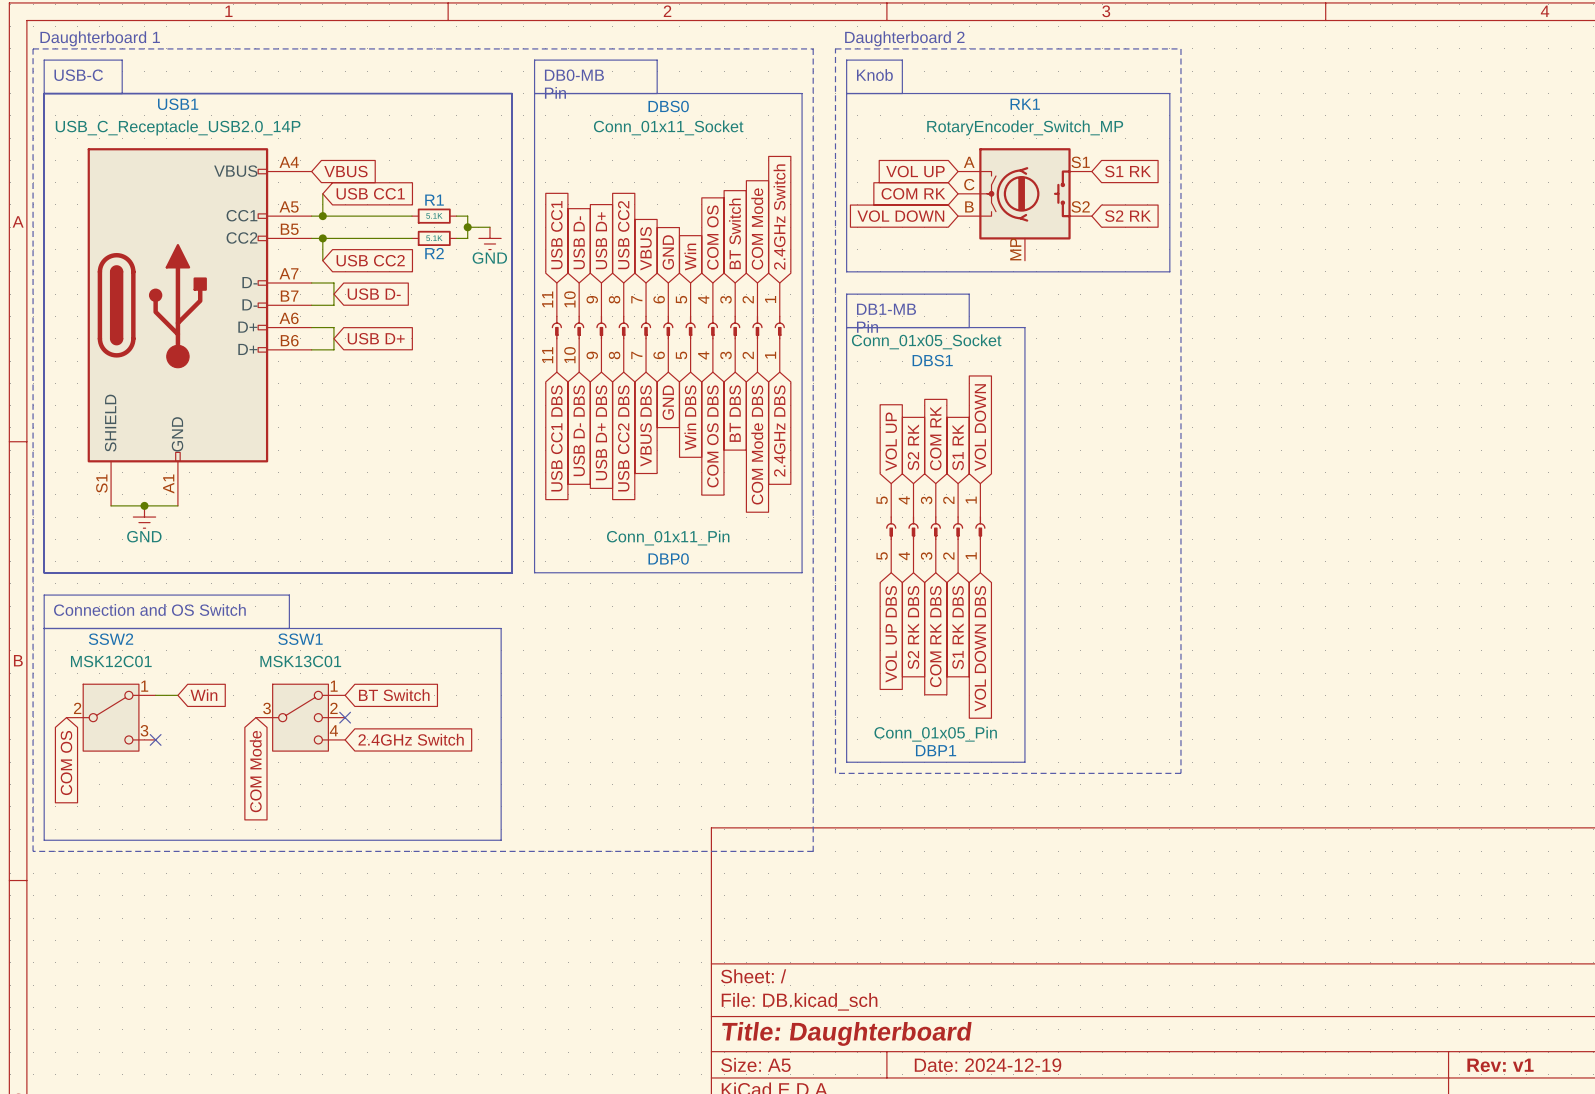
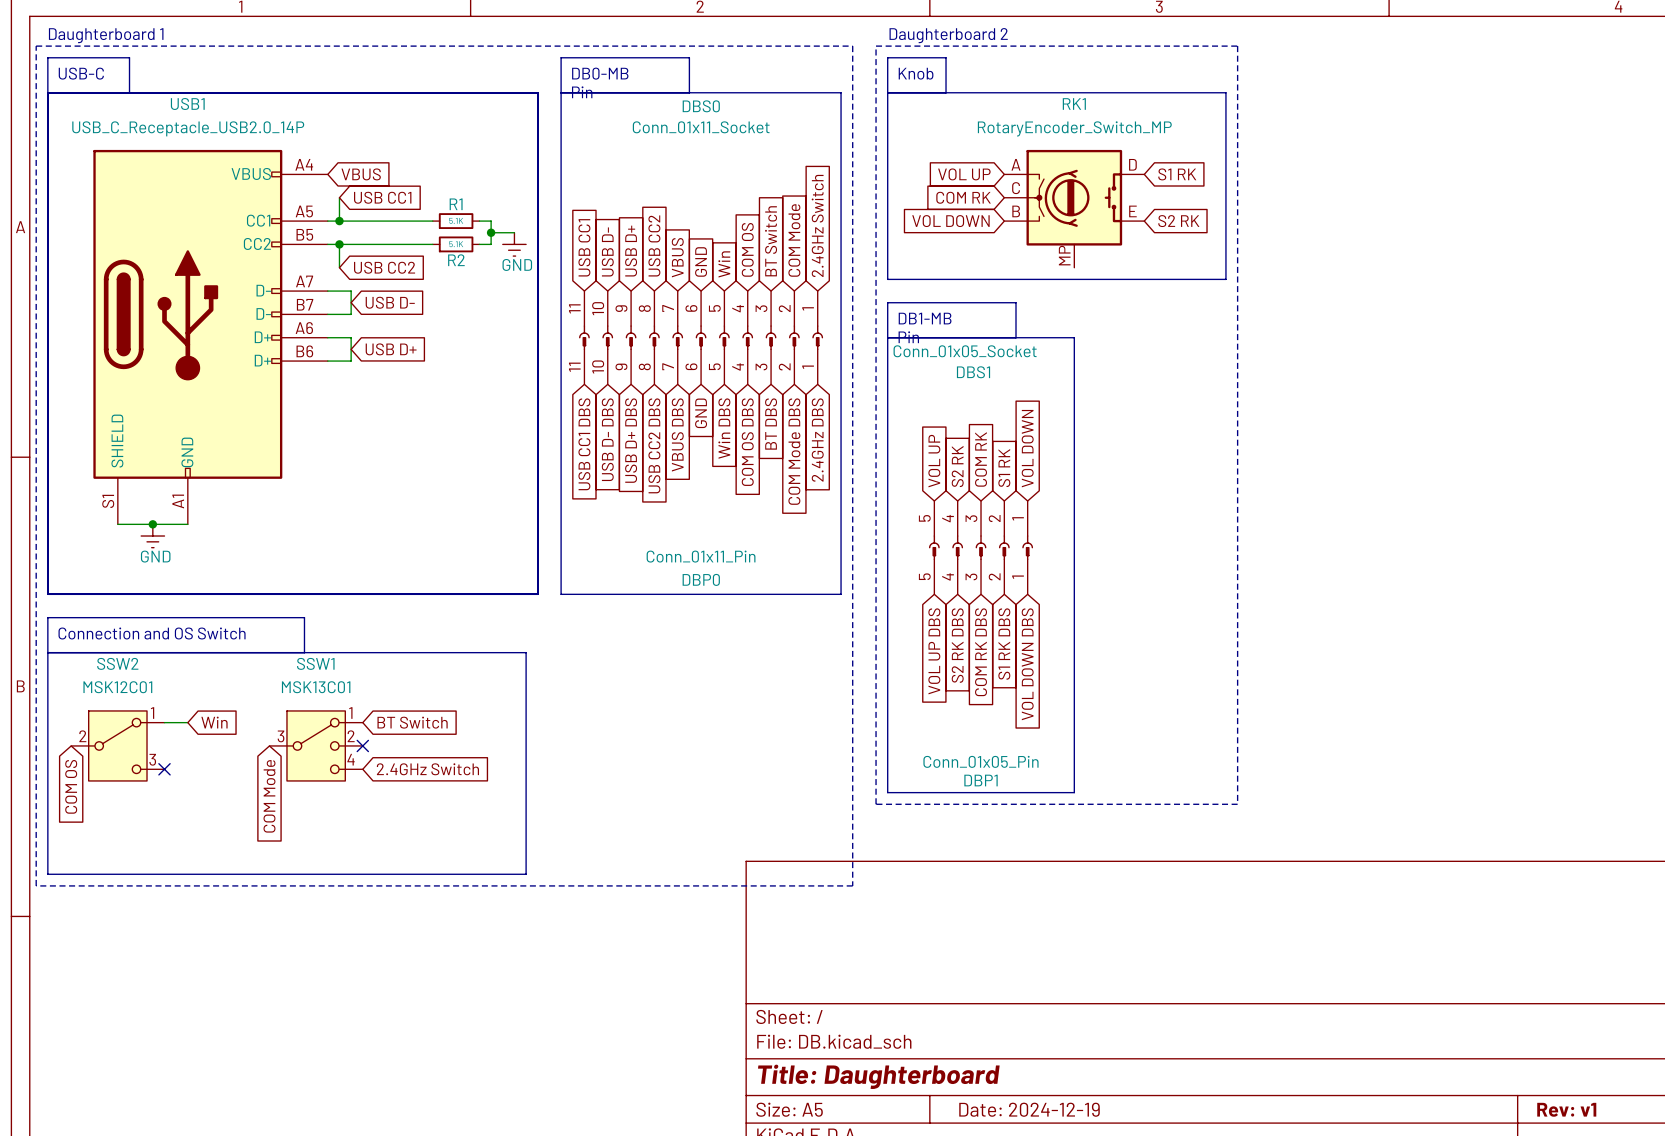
RK1 pin number: S1 (1080, 162) -> D (1132, 164)
RK1 pin number: S2 (1080, 206) -> E (1132, 211)

